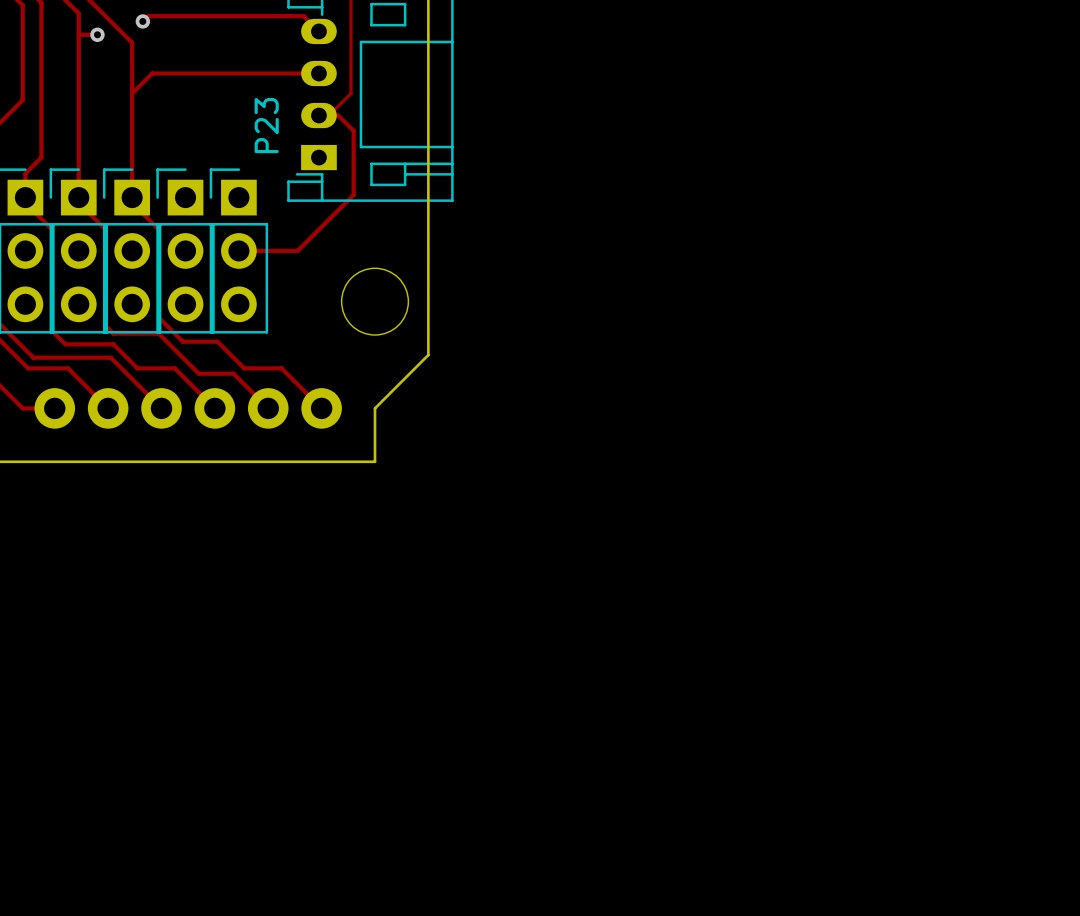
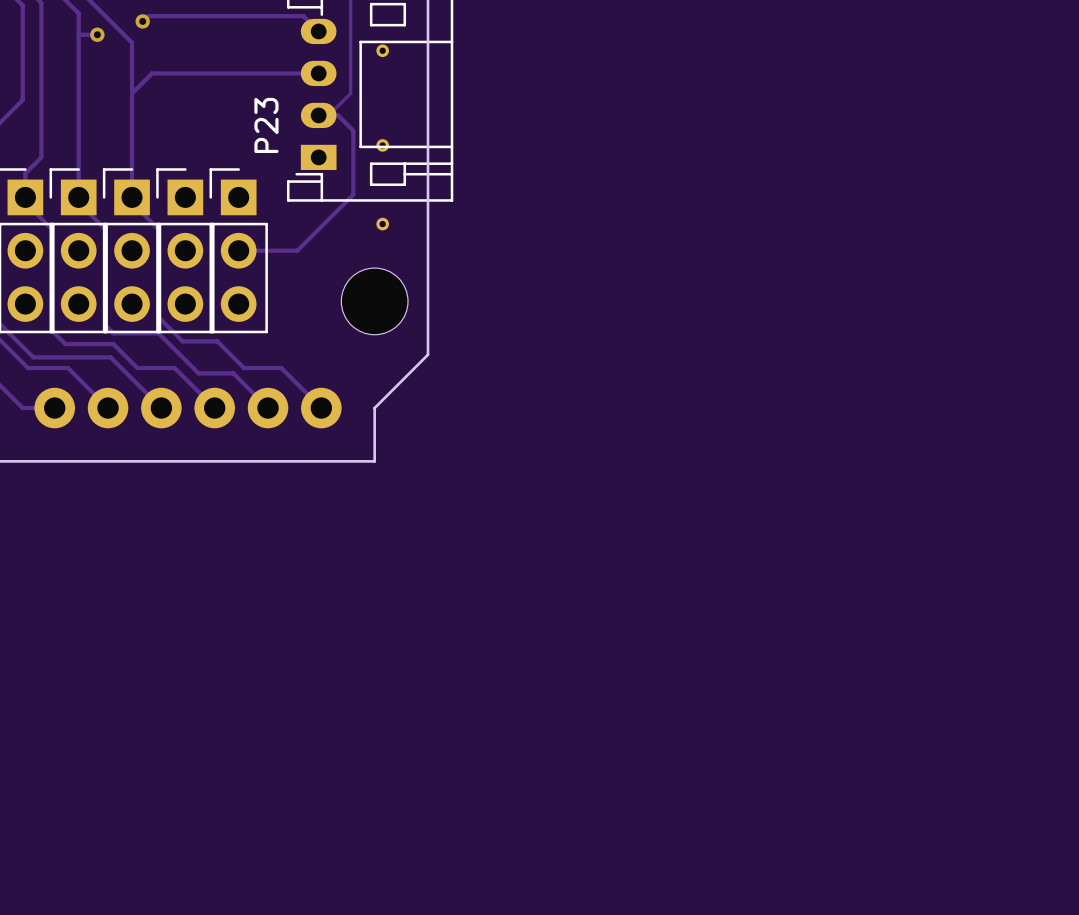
part: none -> (382, 50)
part: none -> (382, 145)
part: none -> (382, 224)

